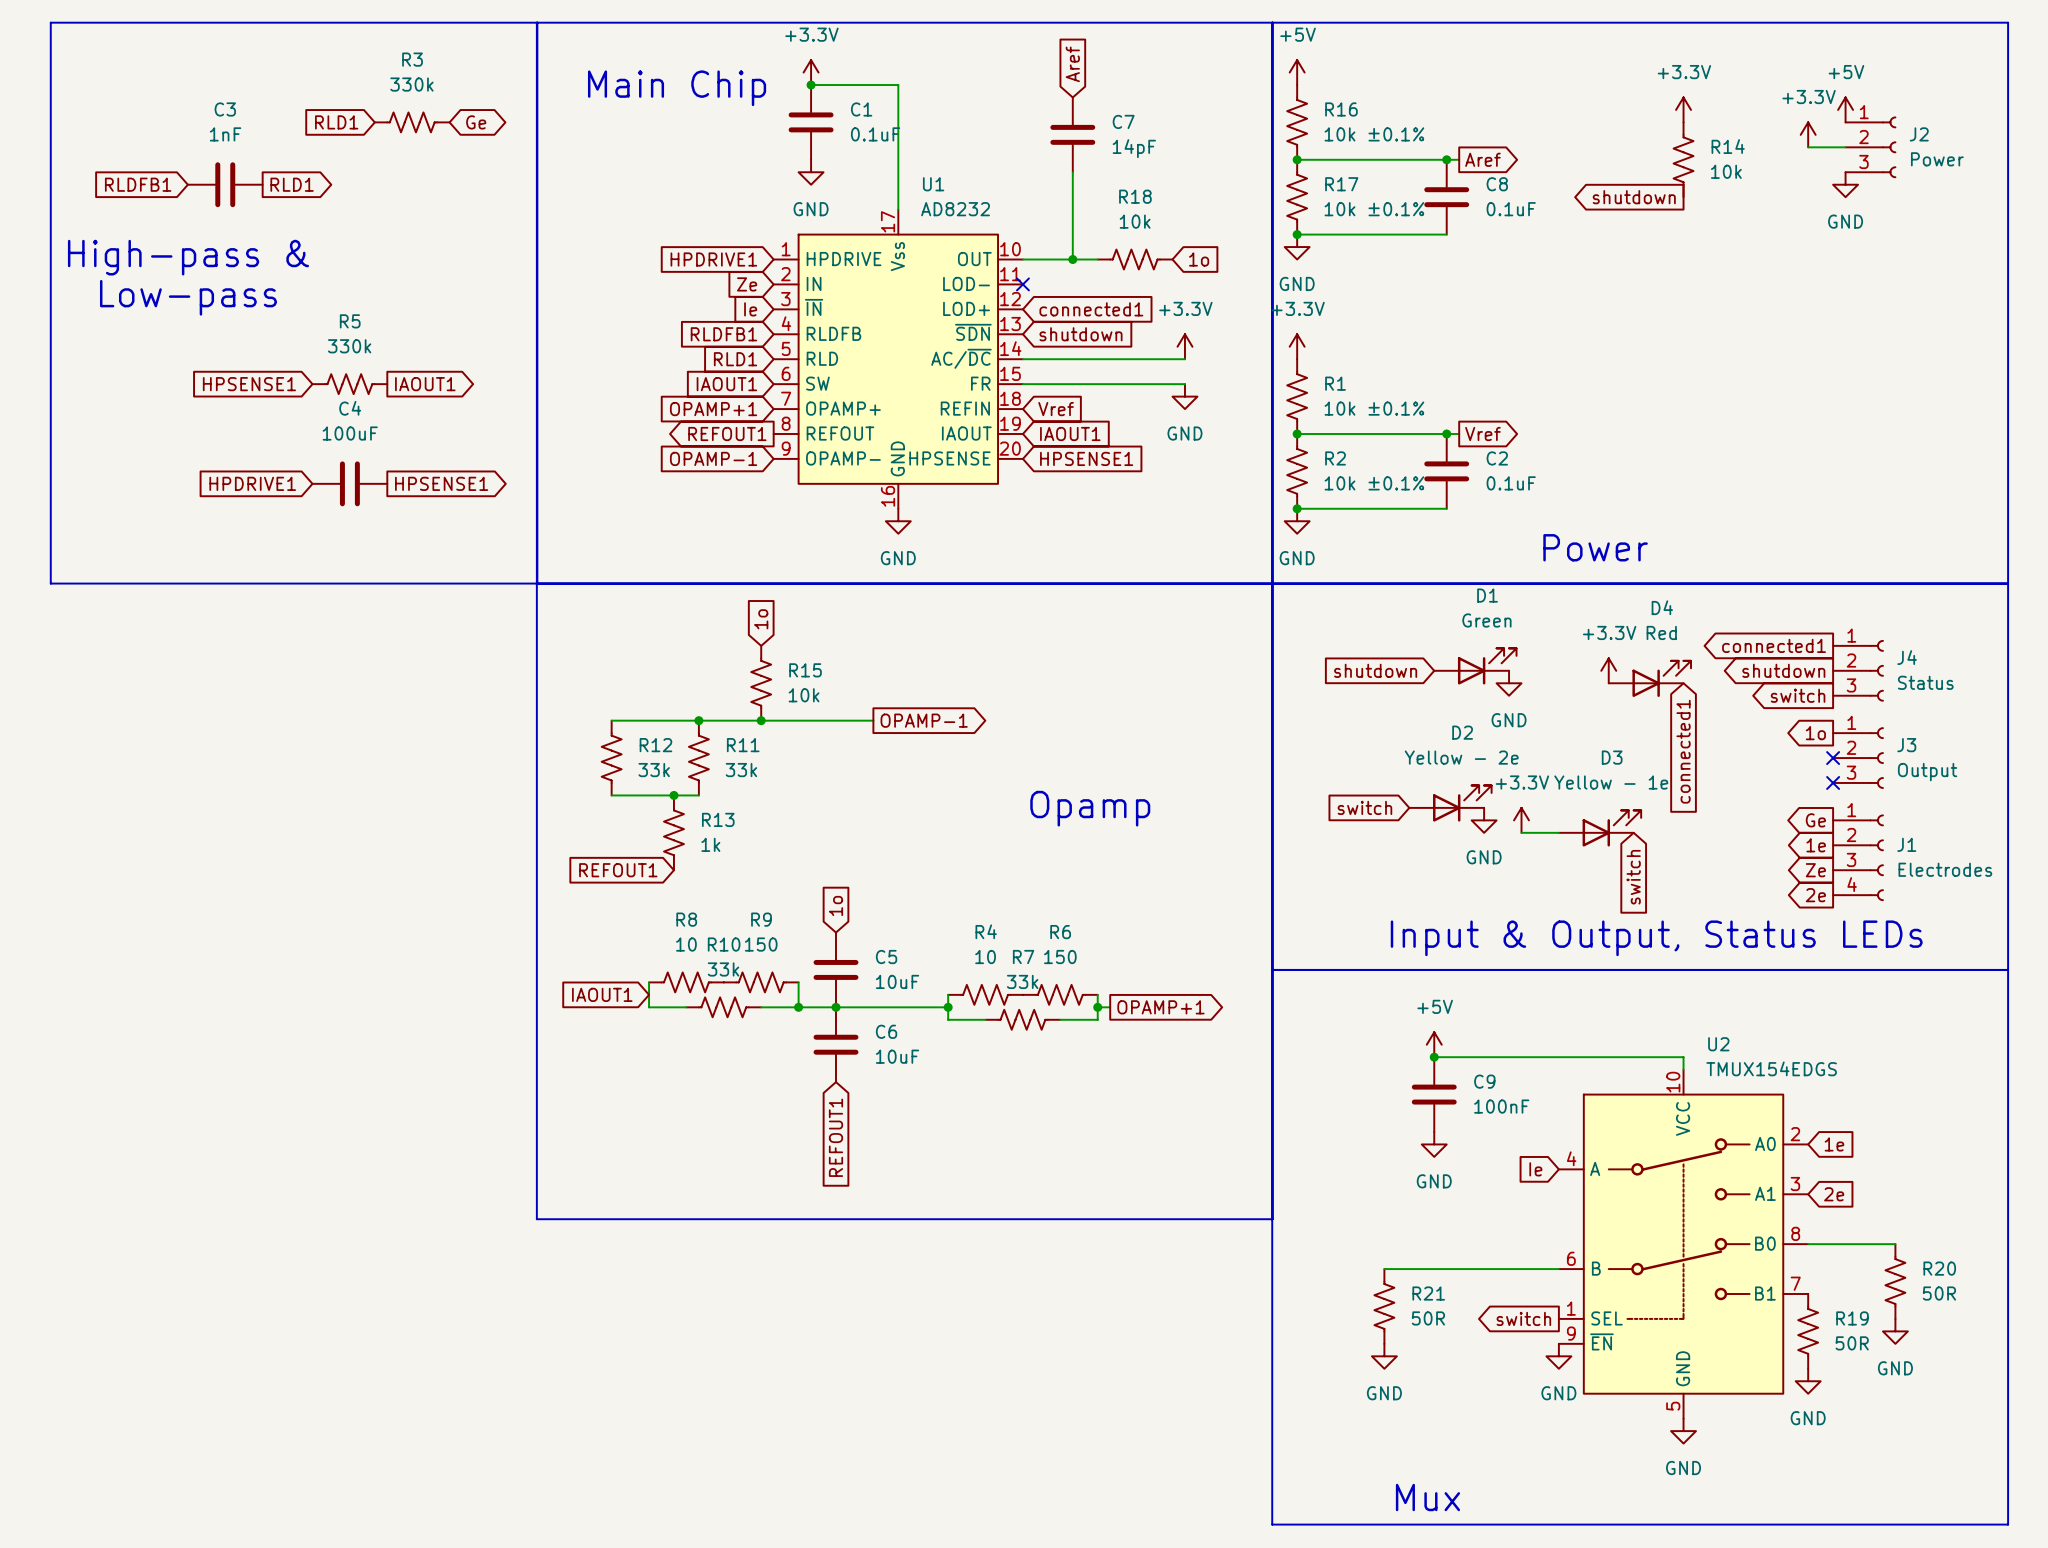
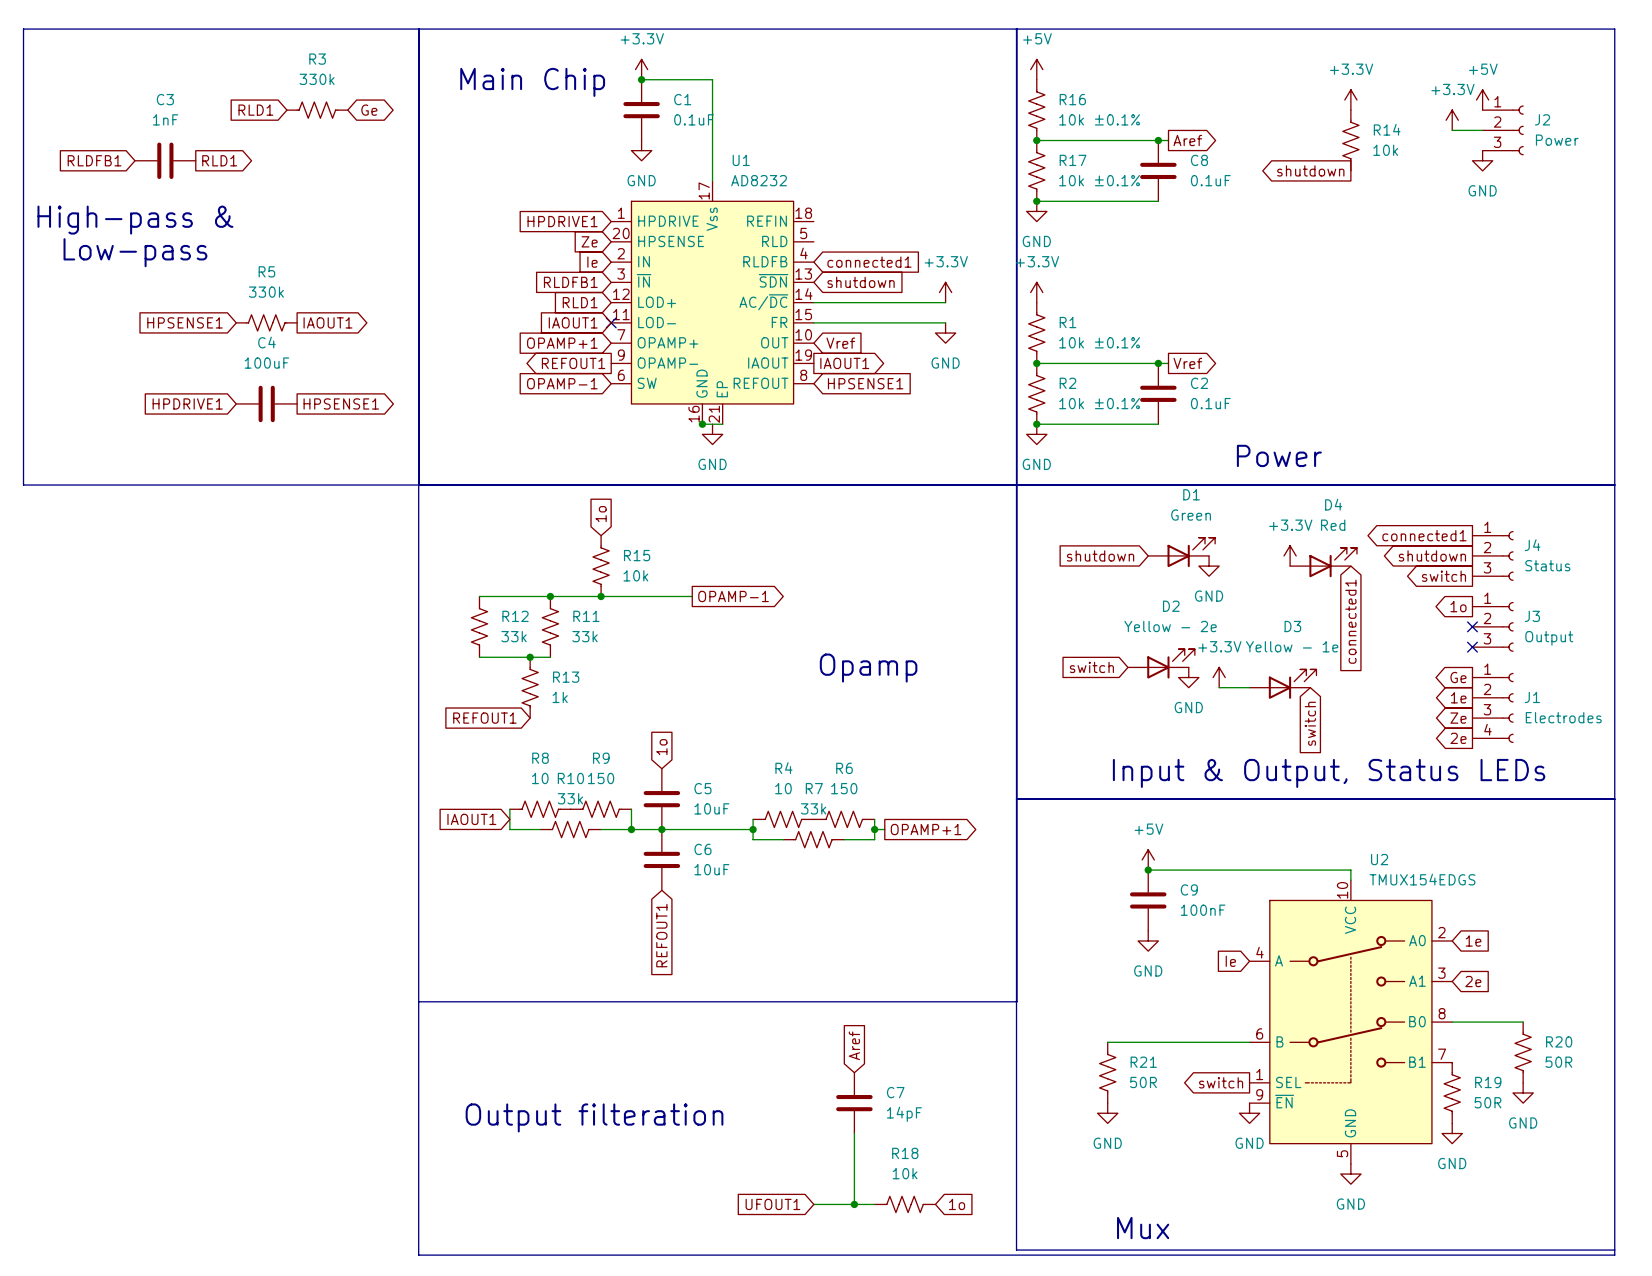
global label: Aref (1072, 64) -> none
C7 position: (1072, 134) -> (854, 1103)
wire: (1072, 172) (1072, 259) -> none
U1 symbol: [773, 209, 1023, 509] -> [611, 181, 814, 425]
wire: (1022, 259) (1097, 259) -> none
junction: (1072, 259) -> none
R18 position: (1135, 259) -> (905, 1204)
global label: 1o (1199, 259) -> none
no-connect mark: (1022, 284) -> none
no-connect mark: none -> (611, 322)
global label shape: input (1070, 433) -> output (844, 363)
wire: none -> (702, 424) (722, 424)
junction: none -> (702, 424)
line: none -> (418, 1001) (418, 1255) (1614, 1255) (1614, 1250)
global label: none -> Aref (854, 1045)
text: none -> Output filteration (594, 1117)
wire: none -> (854, 1133) (854, 1204)
global label: none -> UFOUT1 (772, 1204)
wire: none -> (813, 1204) (874, 1204)
junction: none -> (854, 1204)
global label: none -> 1o (957, 1204)

